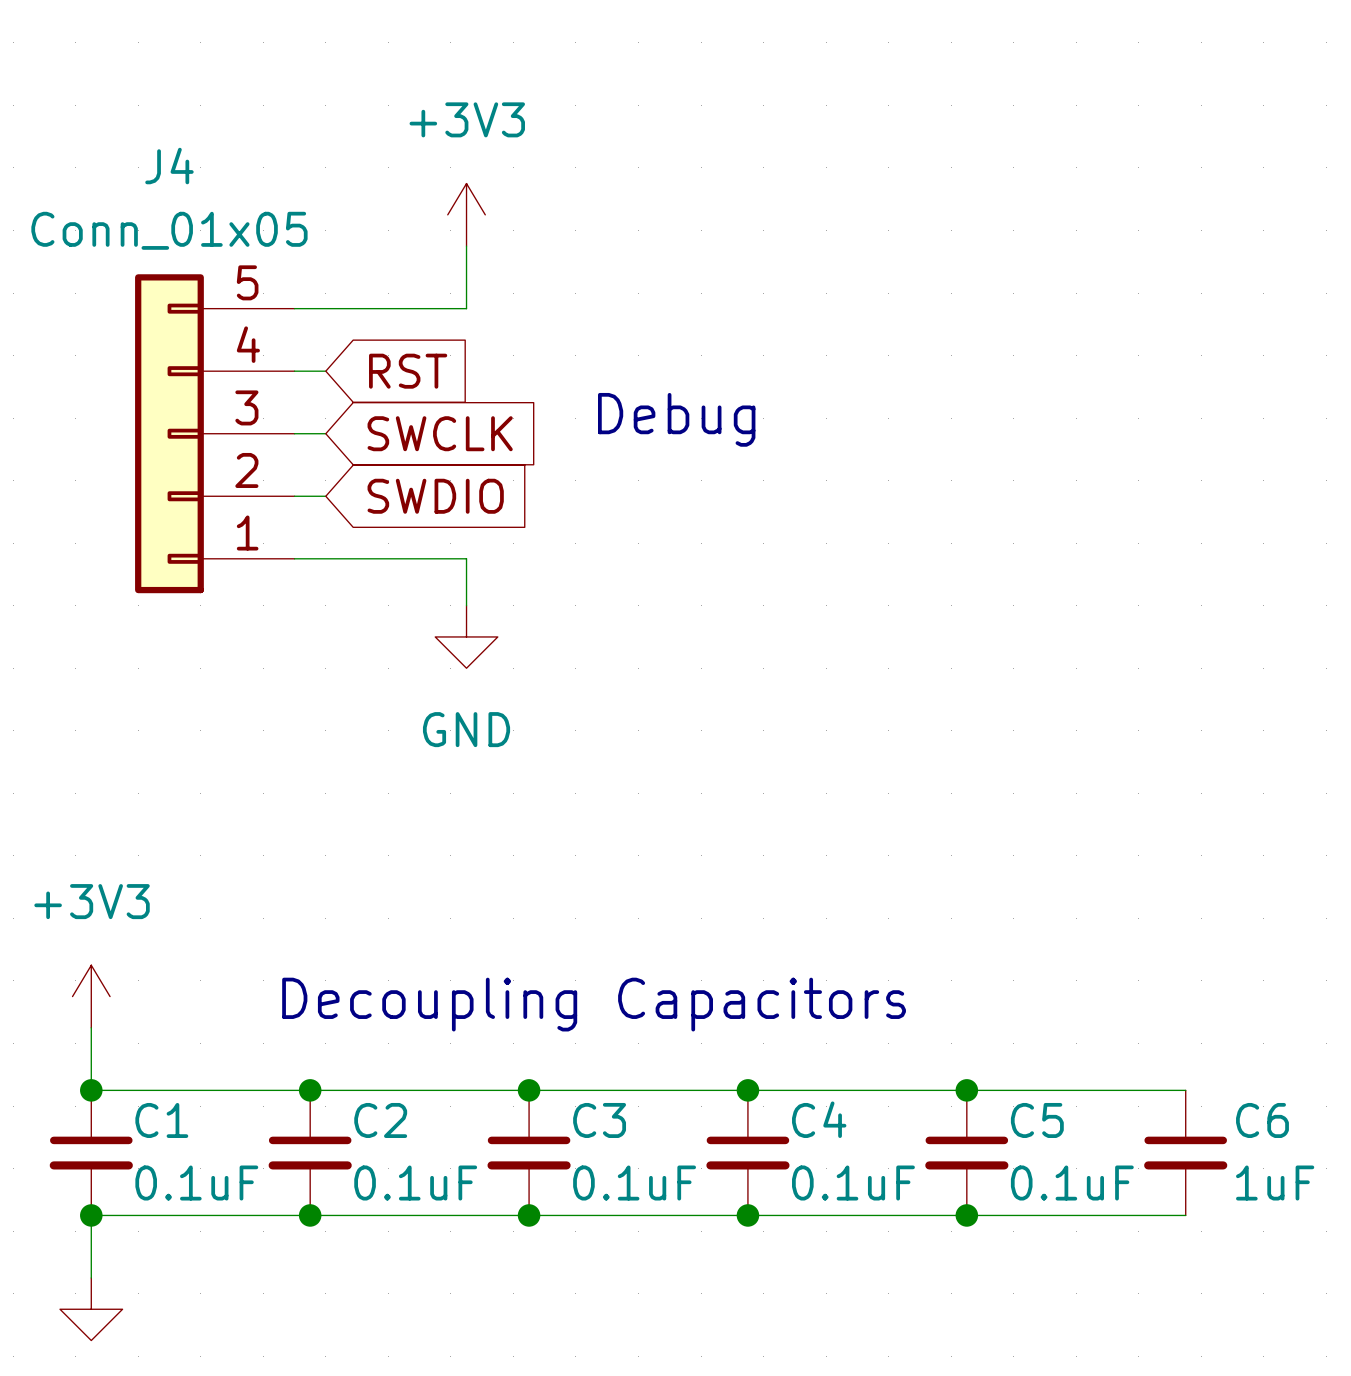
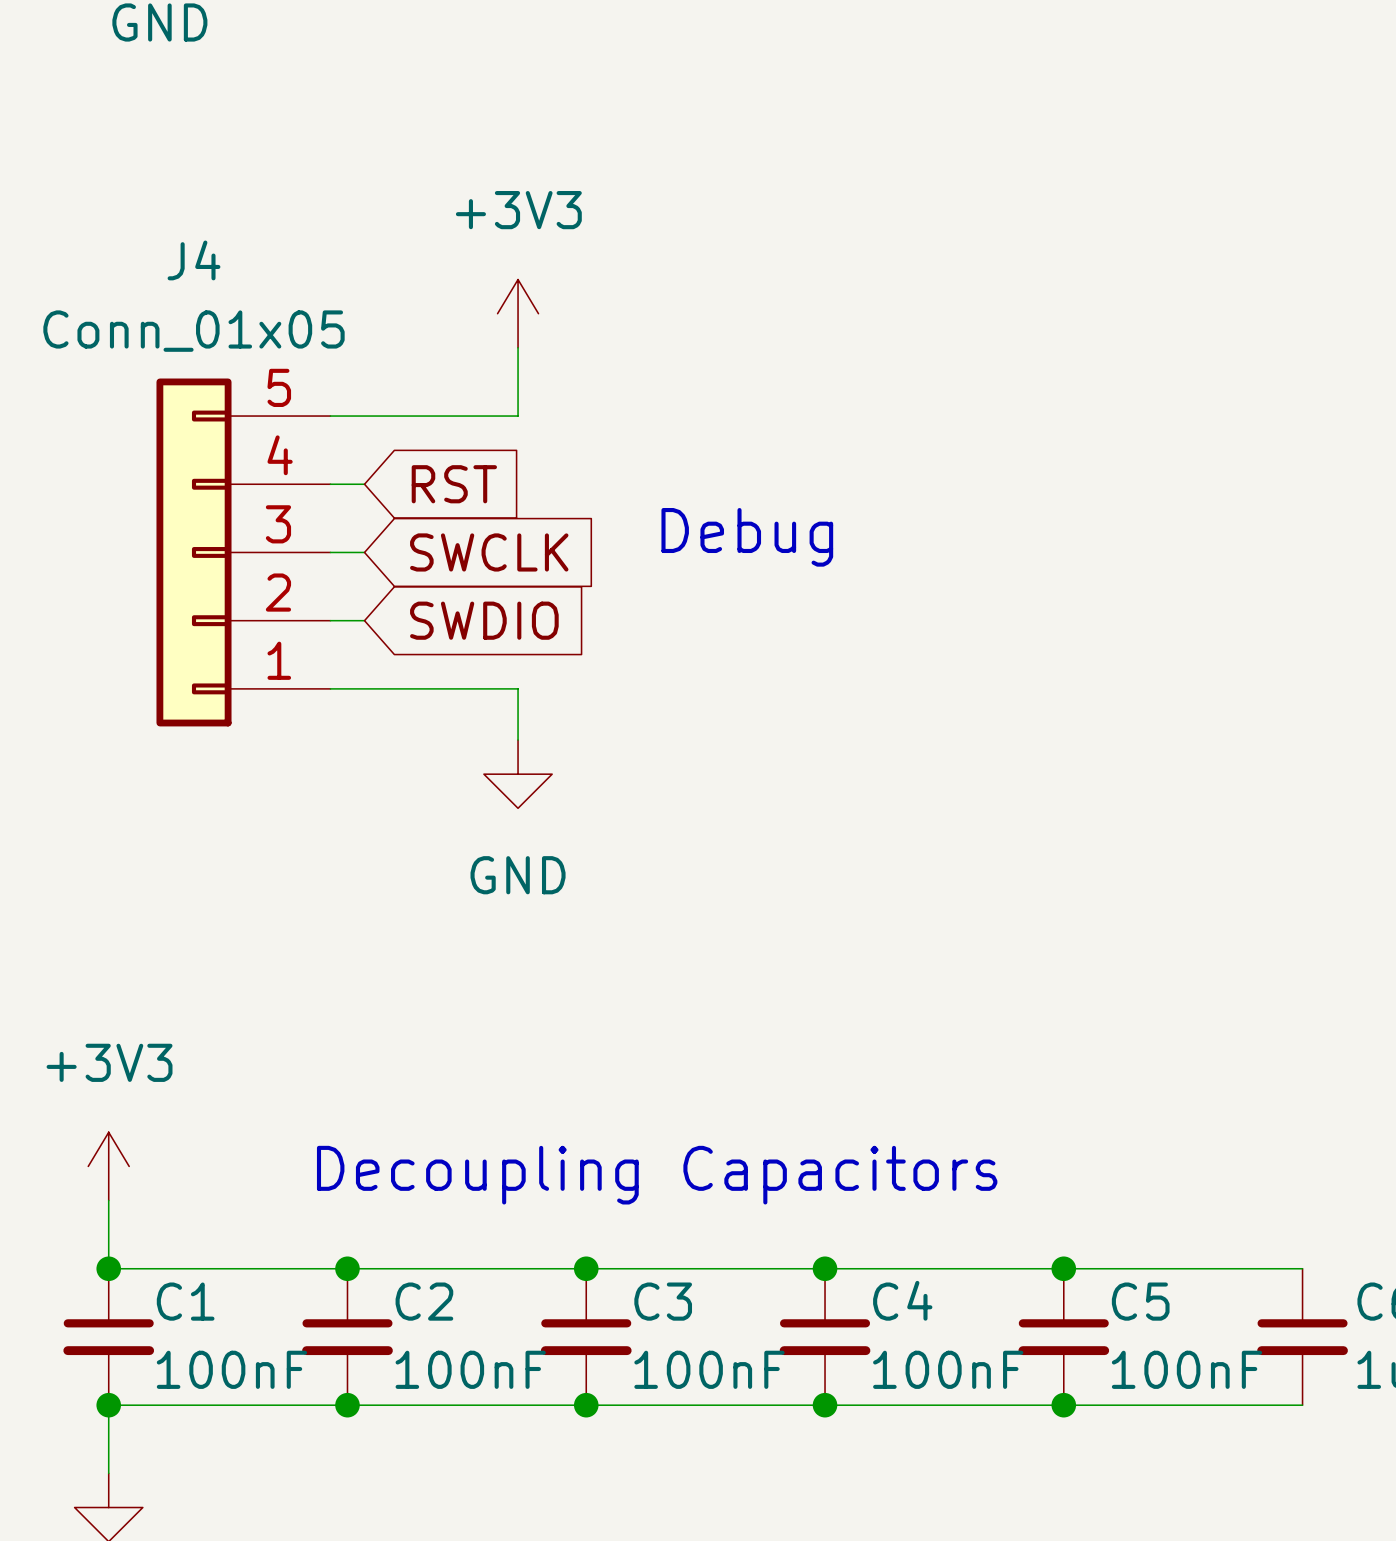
C1 value: 0.1uF (196, 1183) -> 100nF (231, 1369)
C2 value: 0.1uF (415, 1183) -> 100nF (470, 1369)
C3 value: 0.1uF (634, 1183) -> 100nF (709, 1369)
C4 value: 0.1uF (853, 1183) -> 100nF (948, 1369)
C5 value: 0.1uF (1072, 1183) -> 100nF (1186, 1369)

